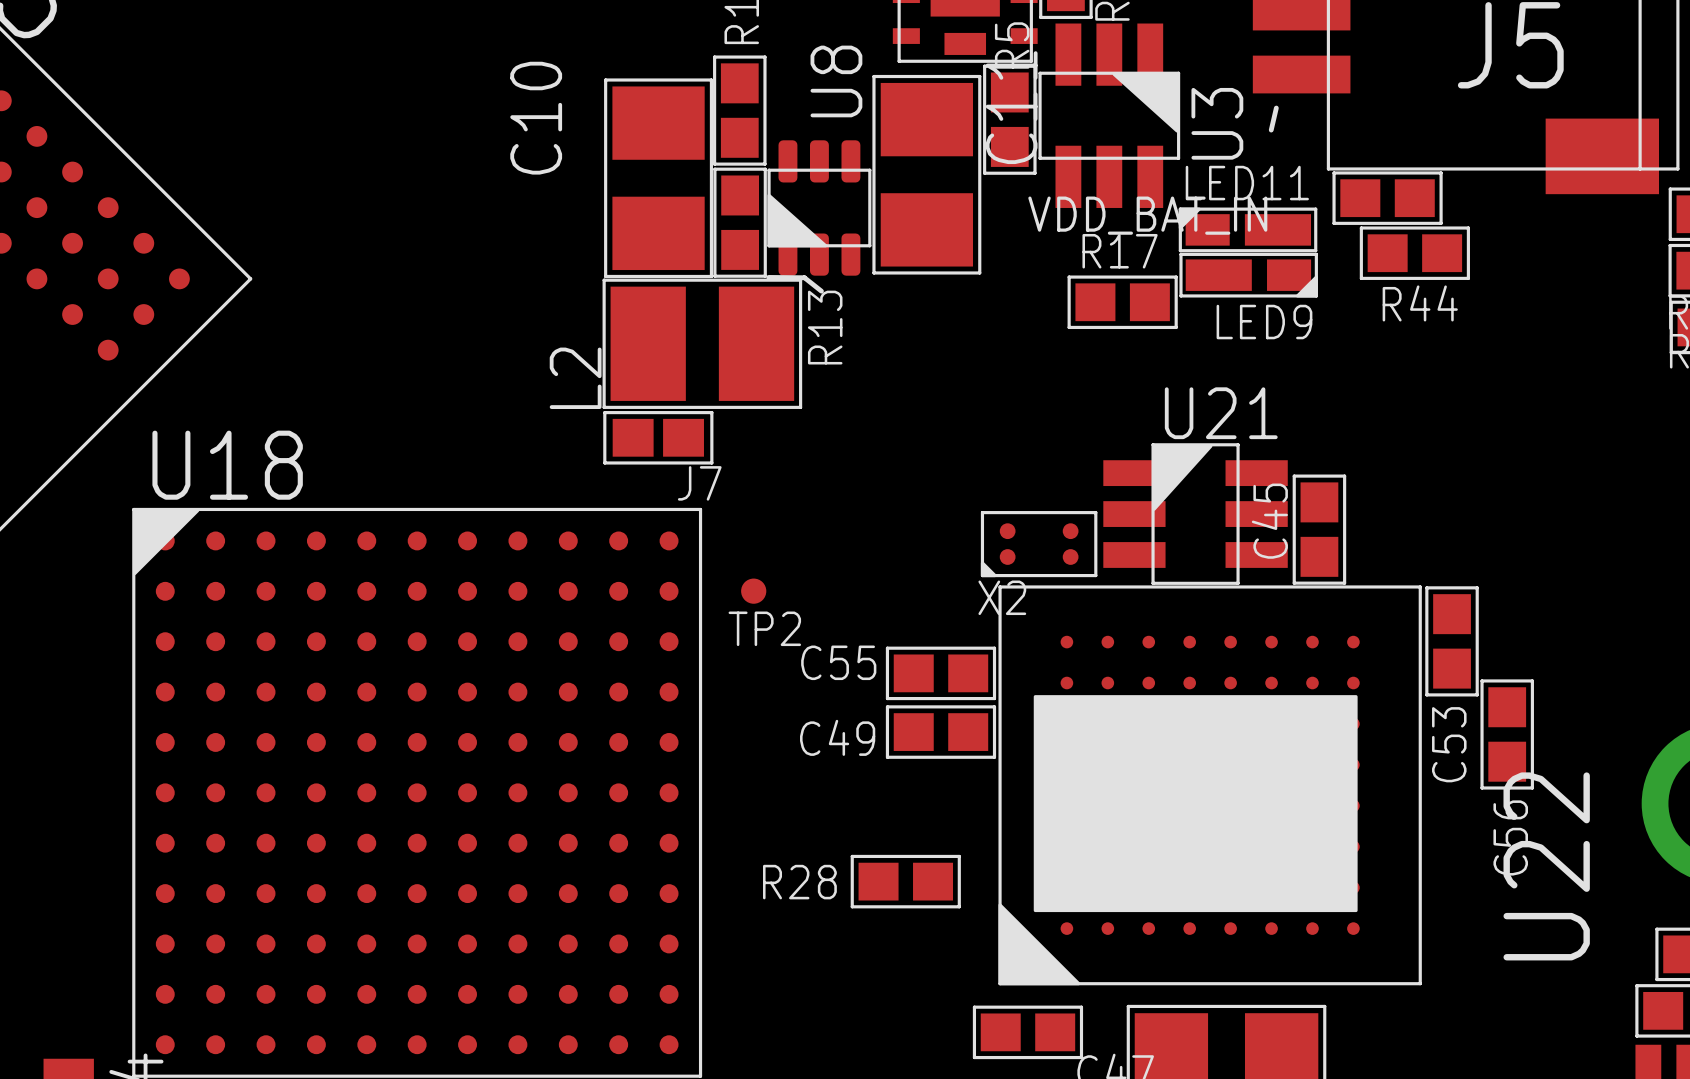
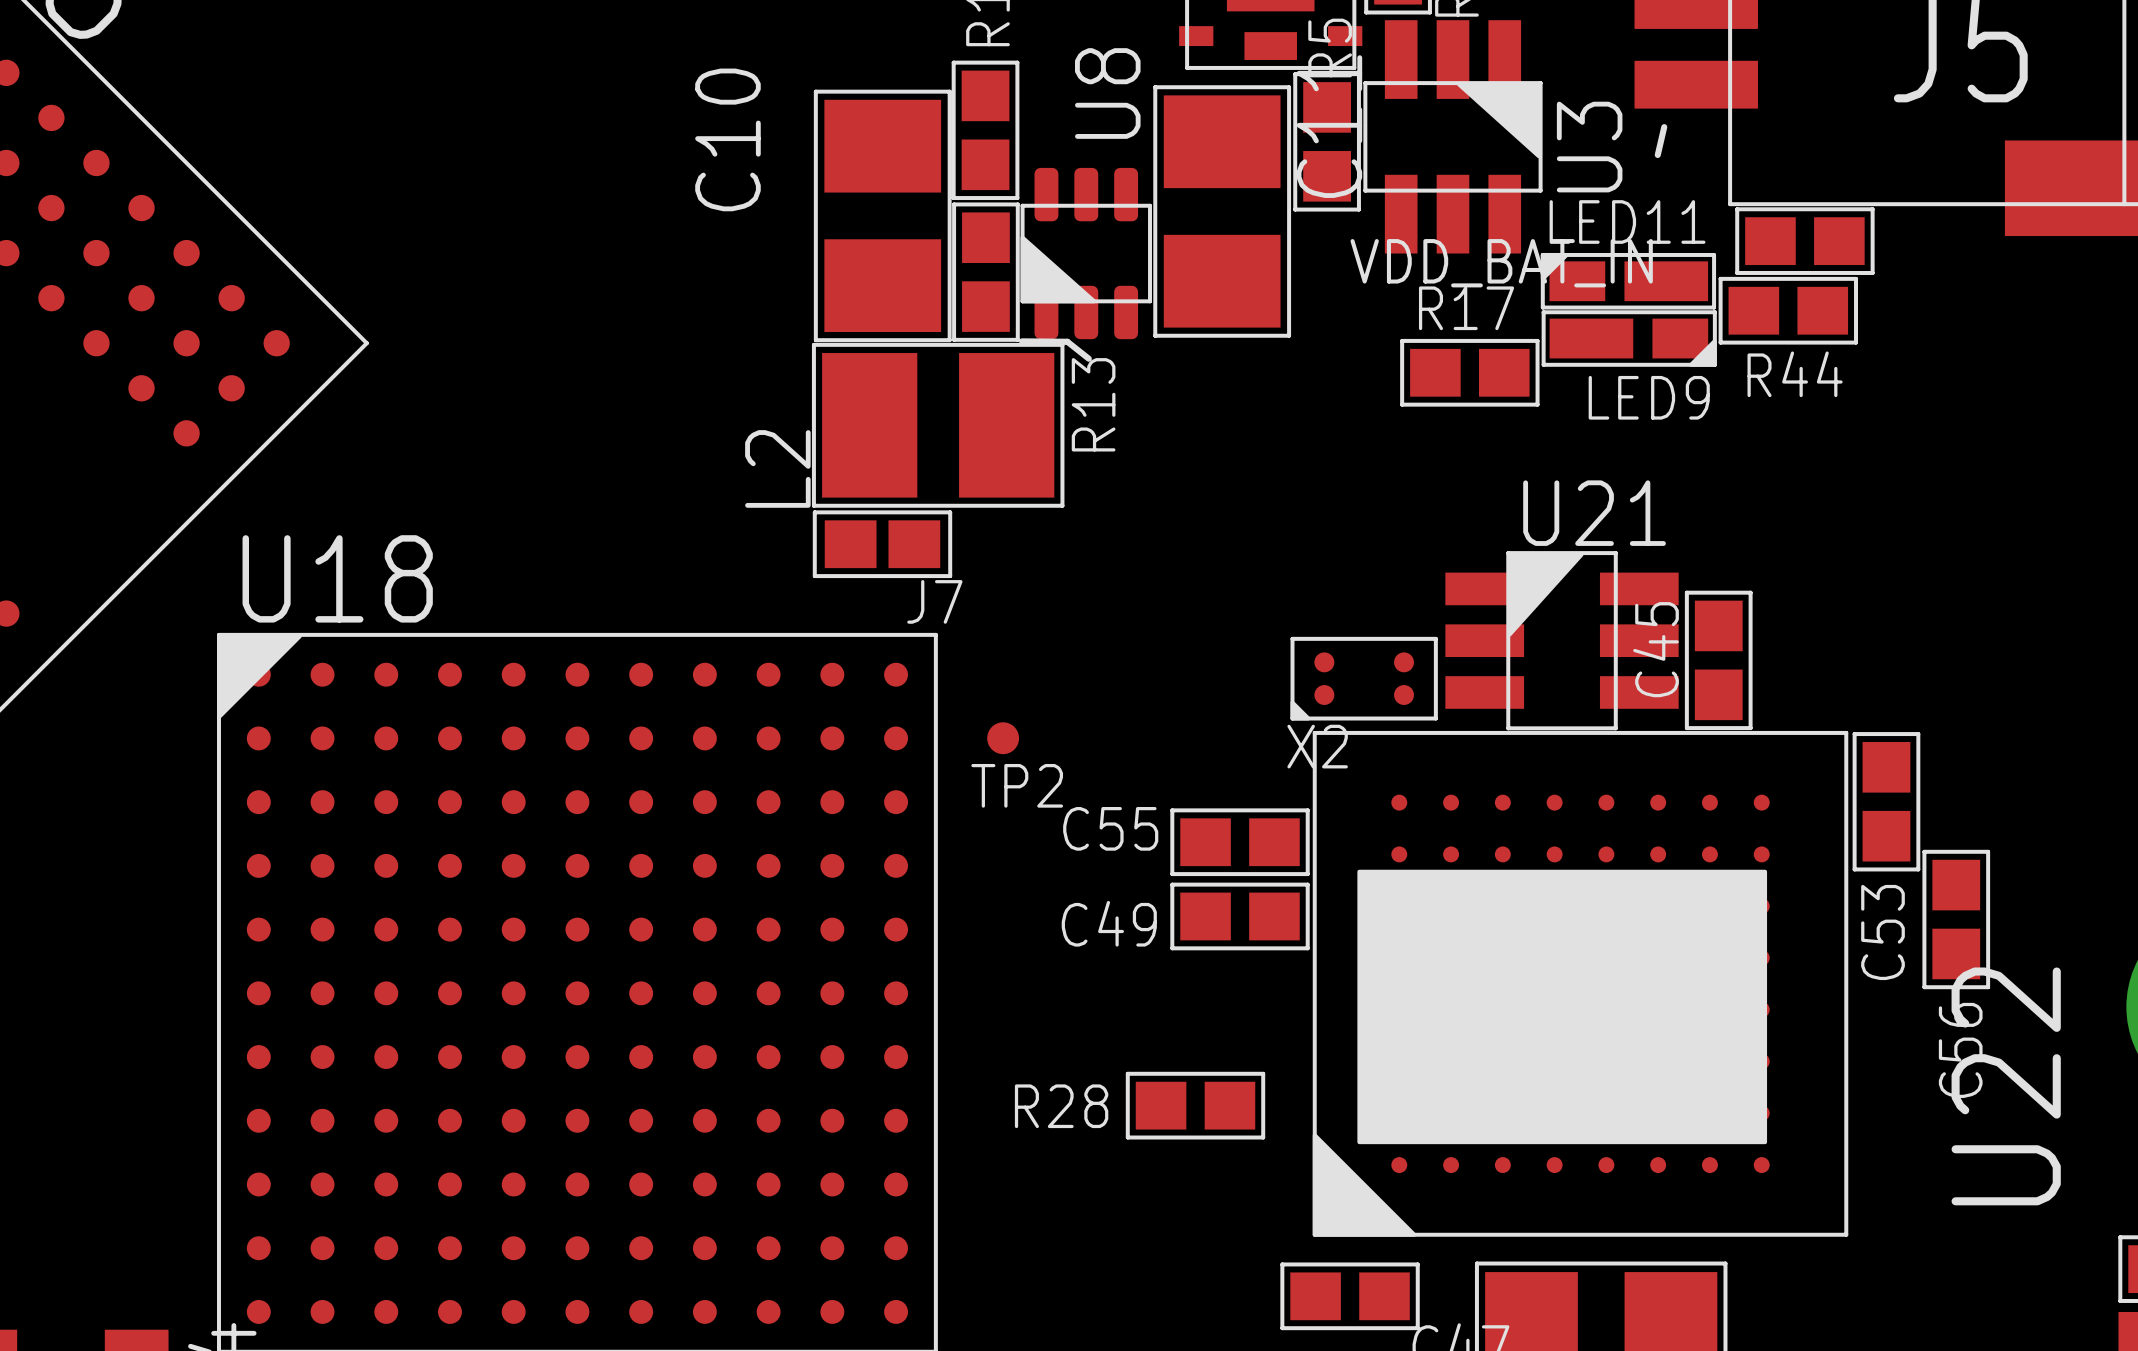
R44 position: (1414, 253) -> (1788, 310)

